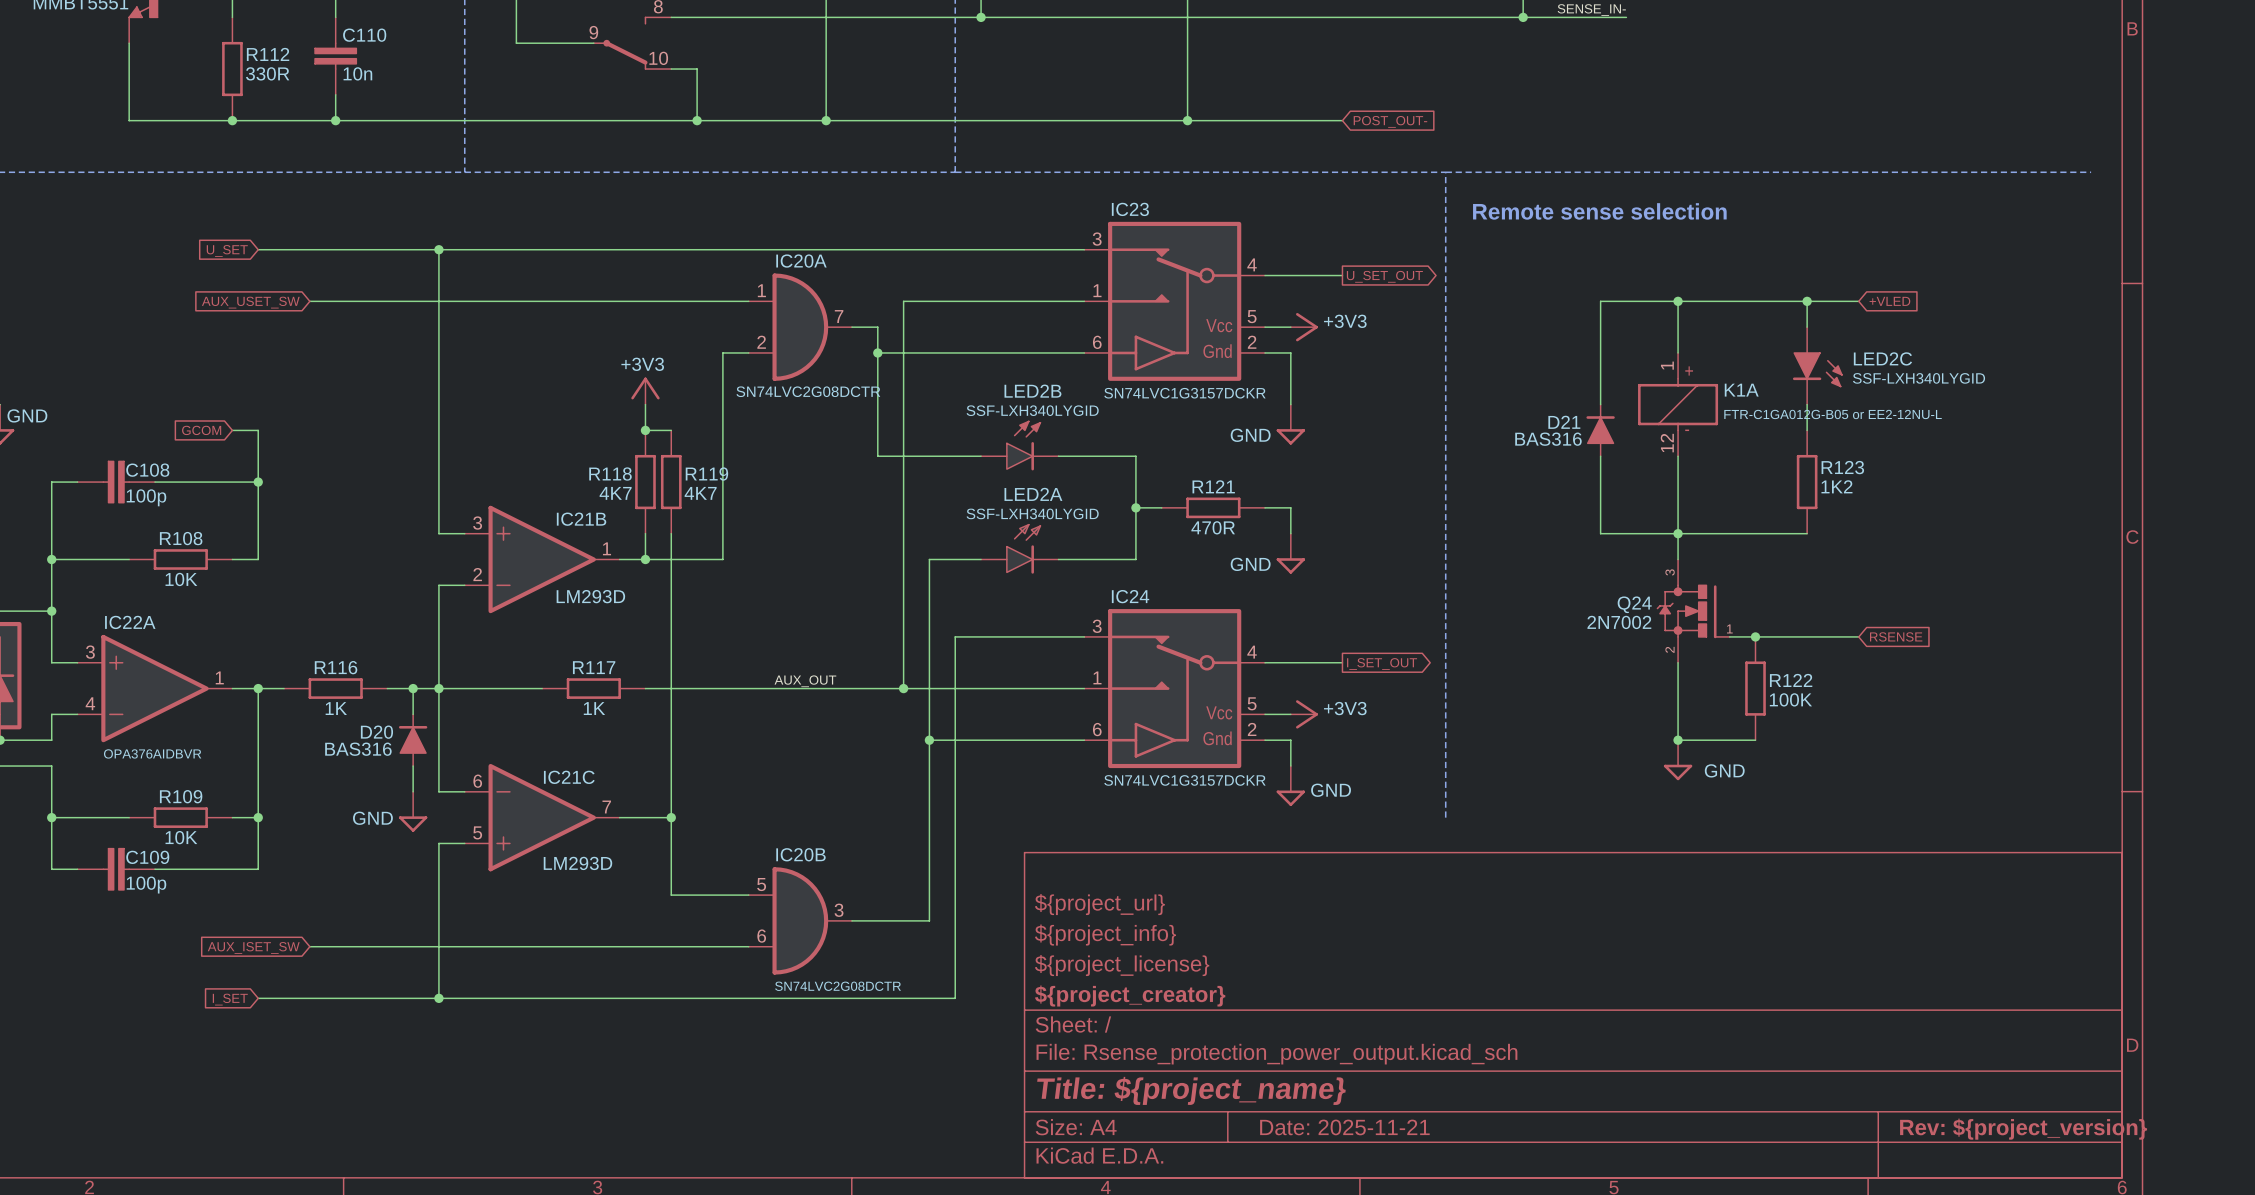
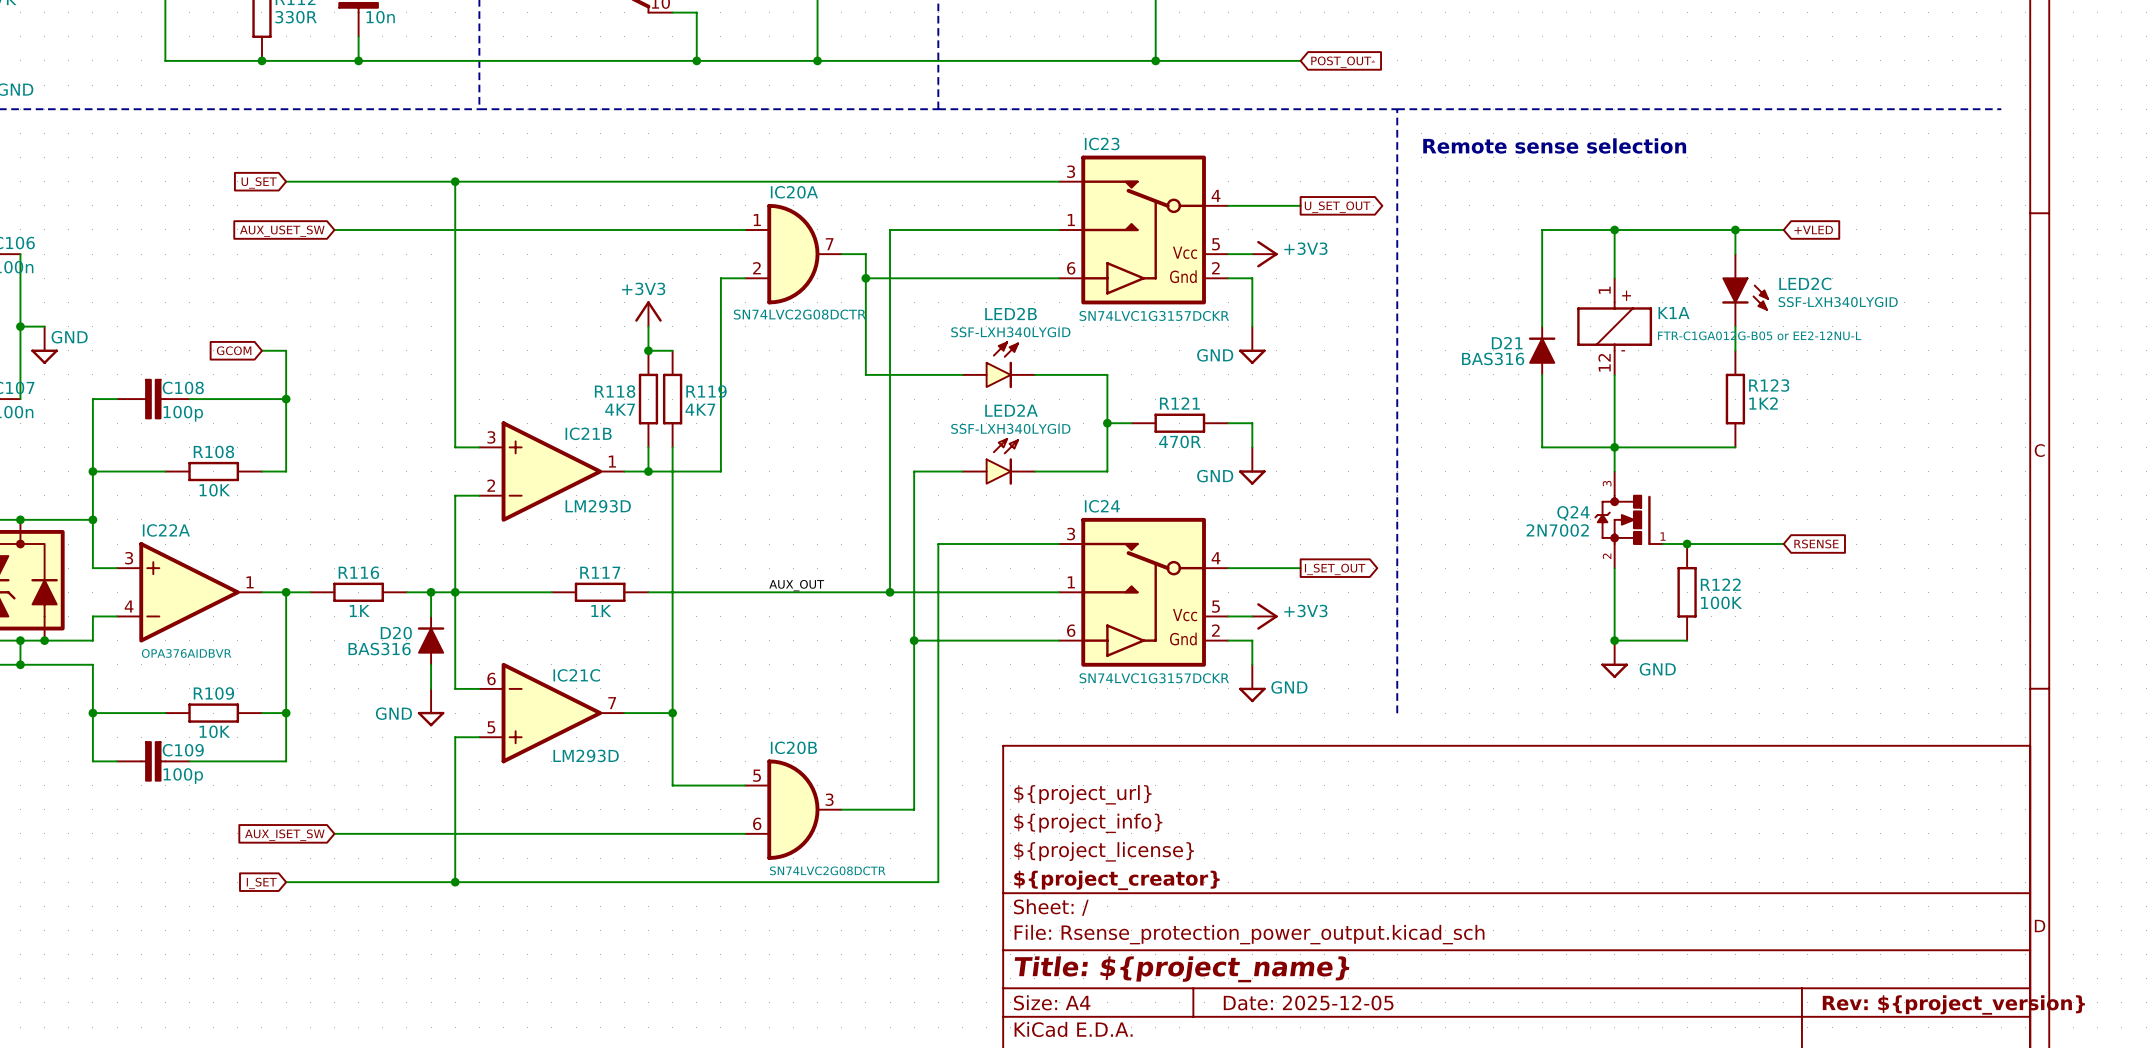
title block: Date: 2025-11-21 (1344, 1127) -> Date: 2025-12-05 (1308, 1002)

